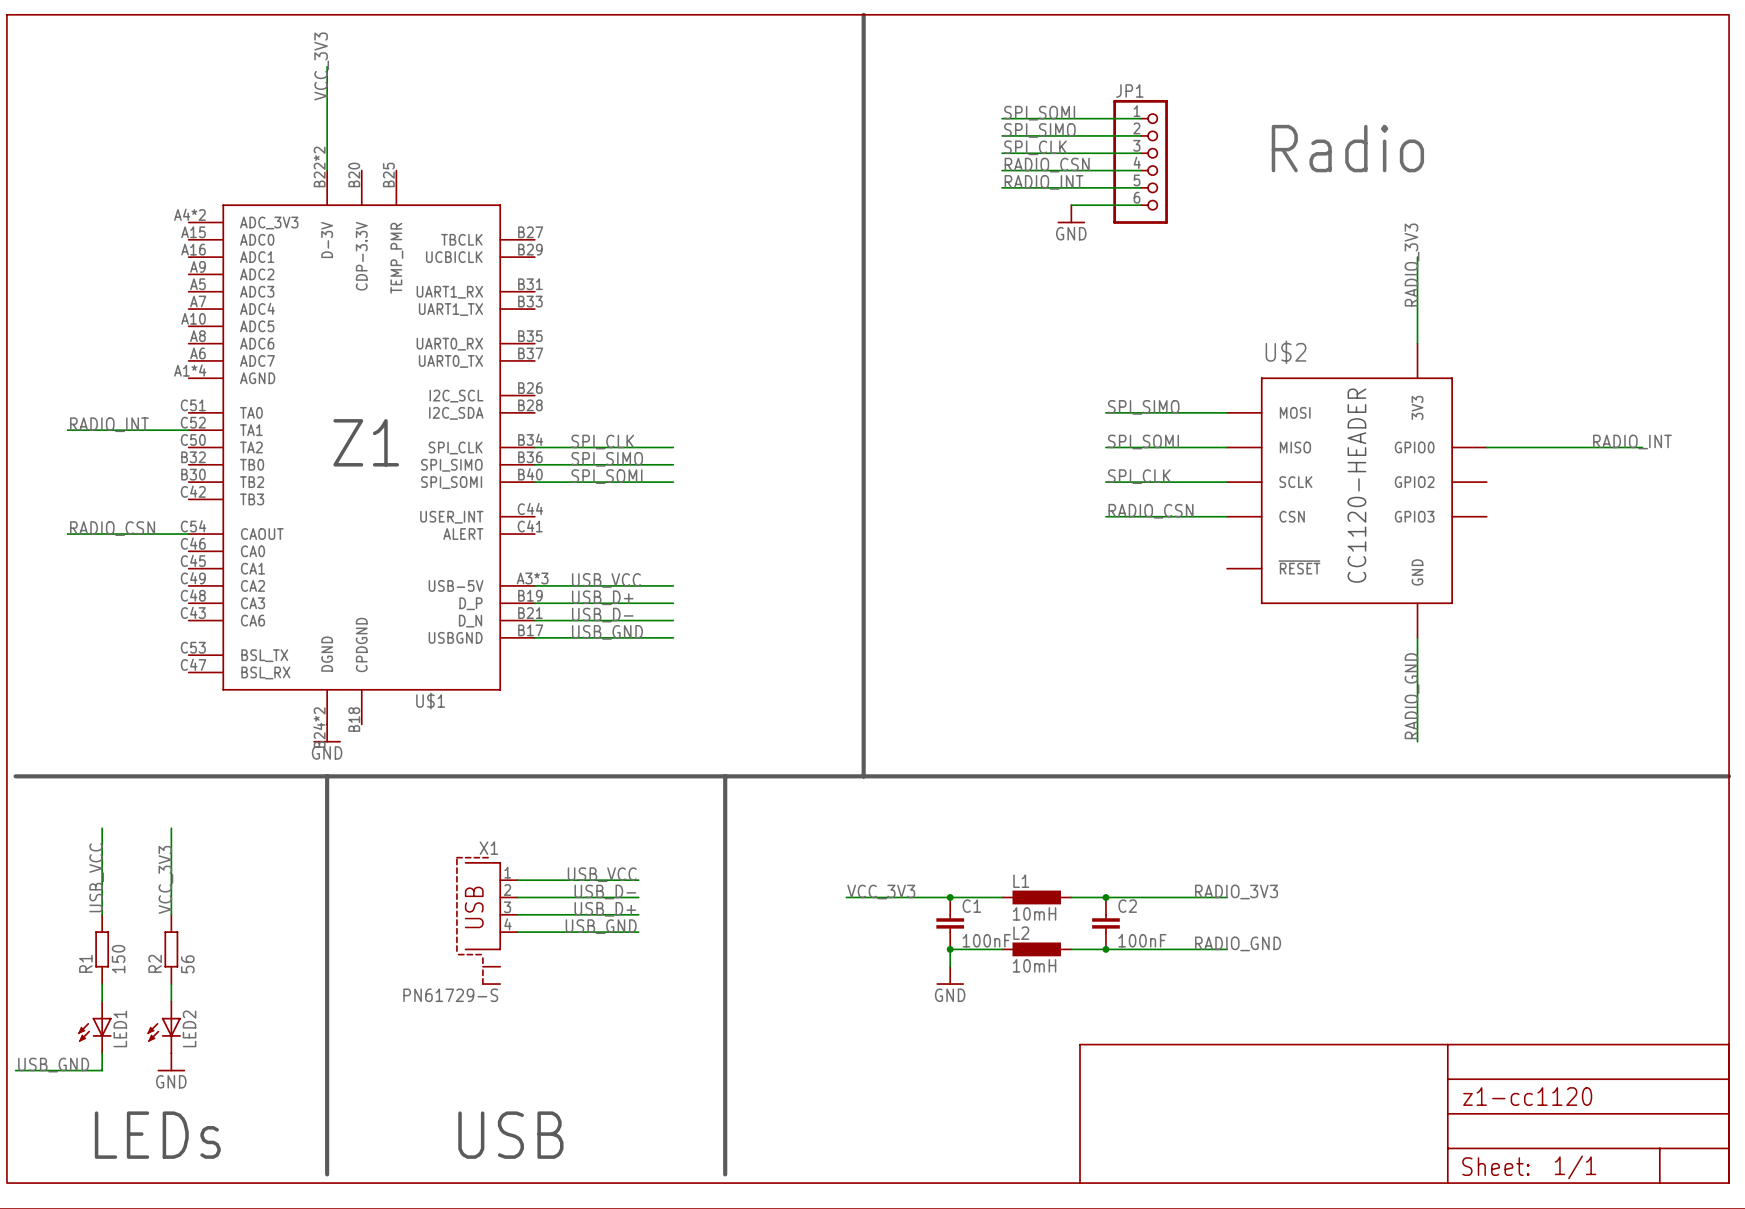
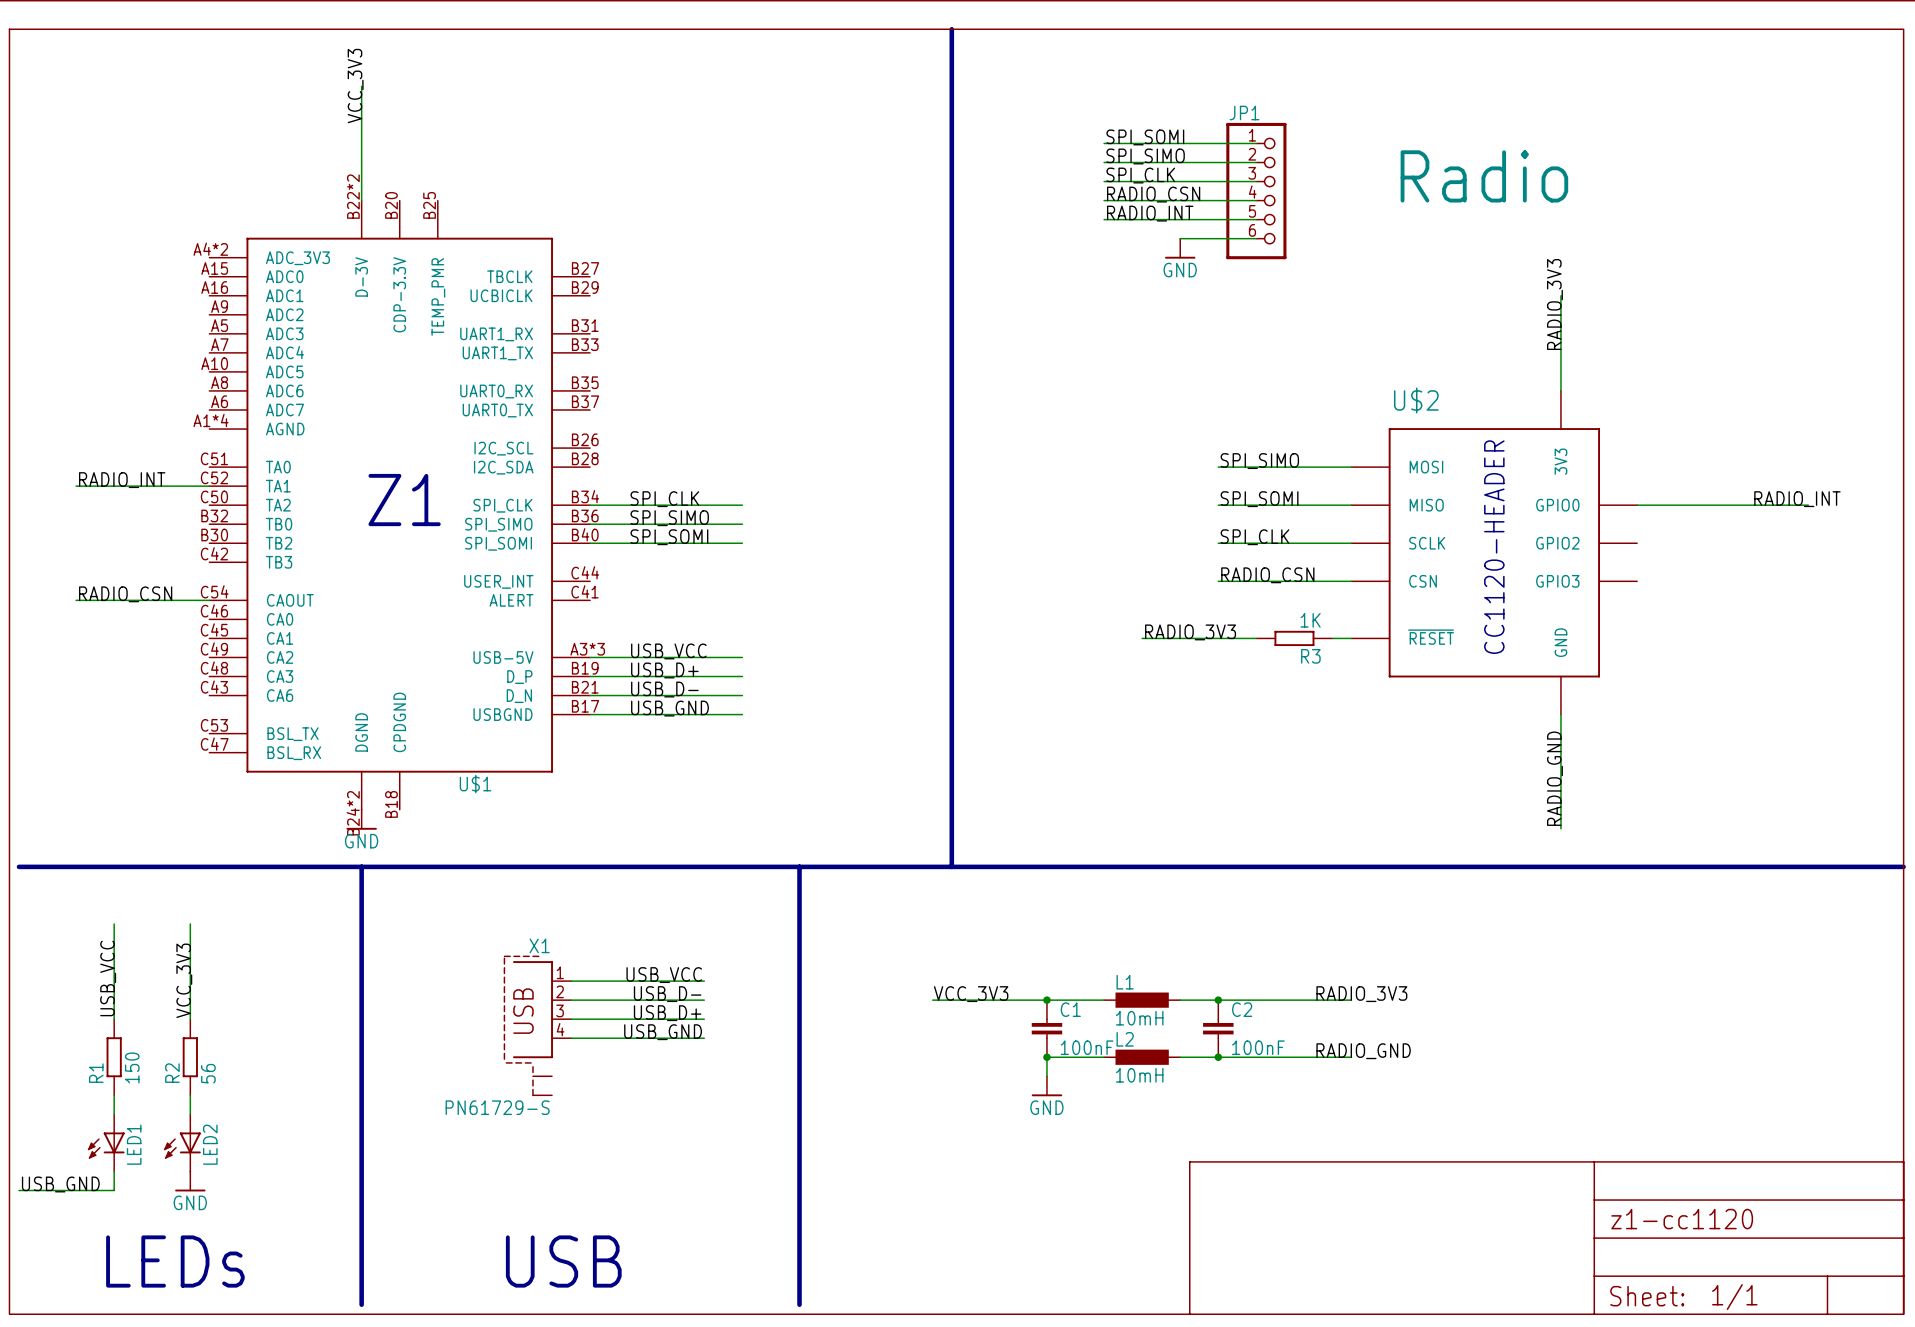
label: none -> RADIO_3V3 (1190, 632)
wire: none -> (1142, 638) (1256, 638)
R3: none -> 1K (1294, 638)
wire: none -> (1332, 638) (1351, 638)

